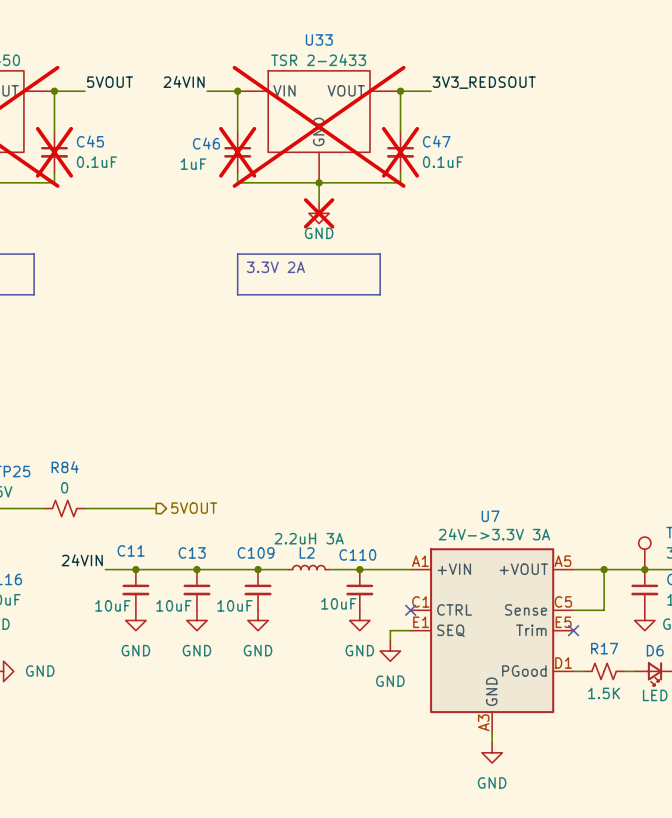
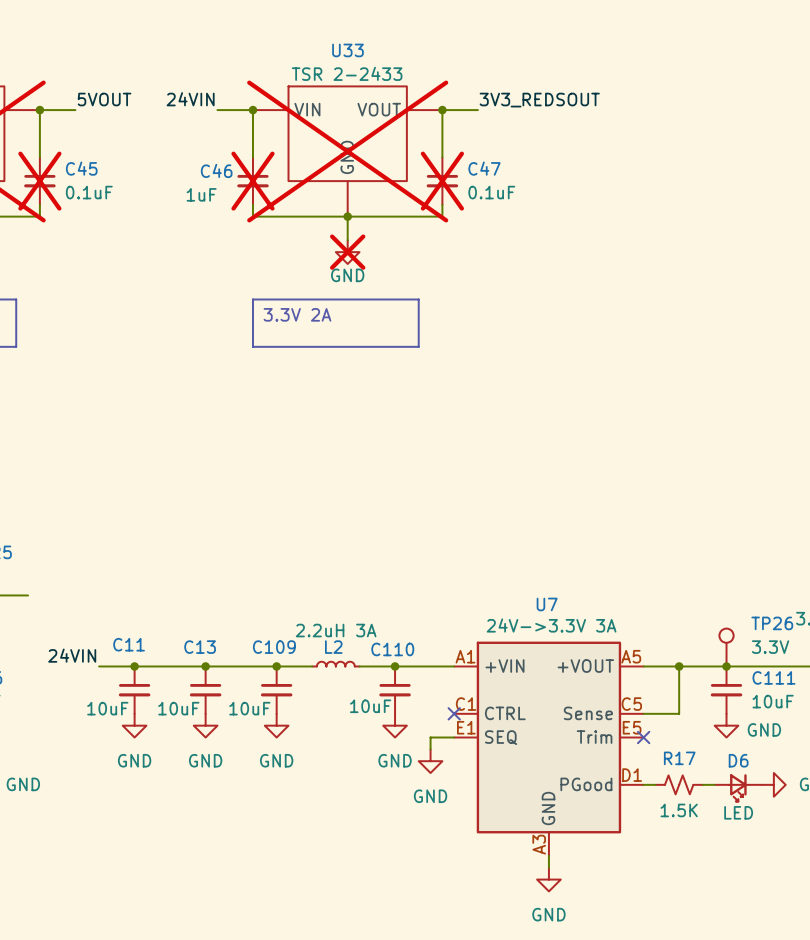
R84: 0 (64, 508) -> none
wire: (85, 508) (156, 508) -> none
hierarchical label: 5VOUT (194, 508) -> none

